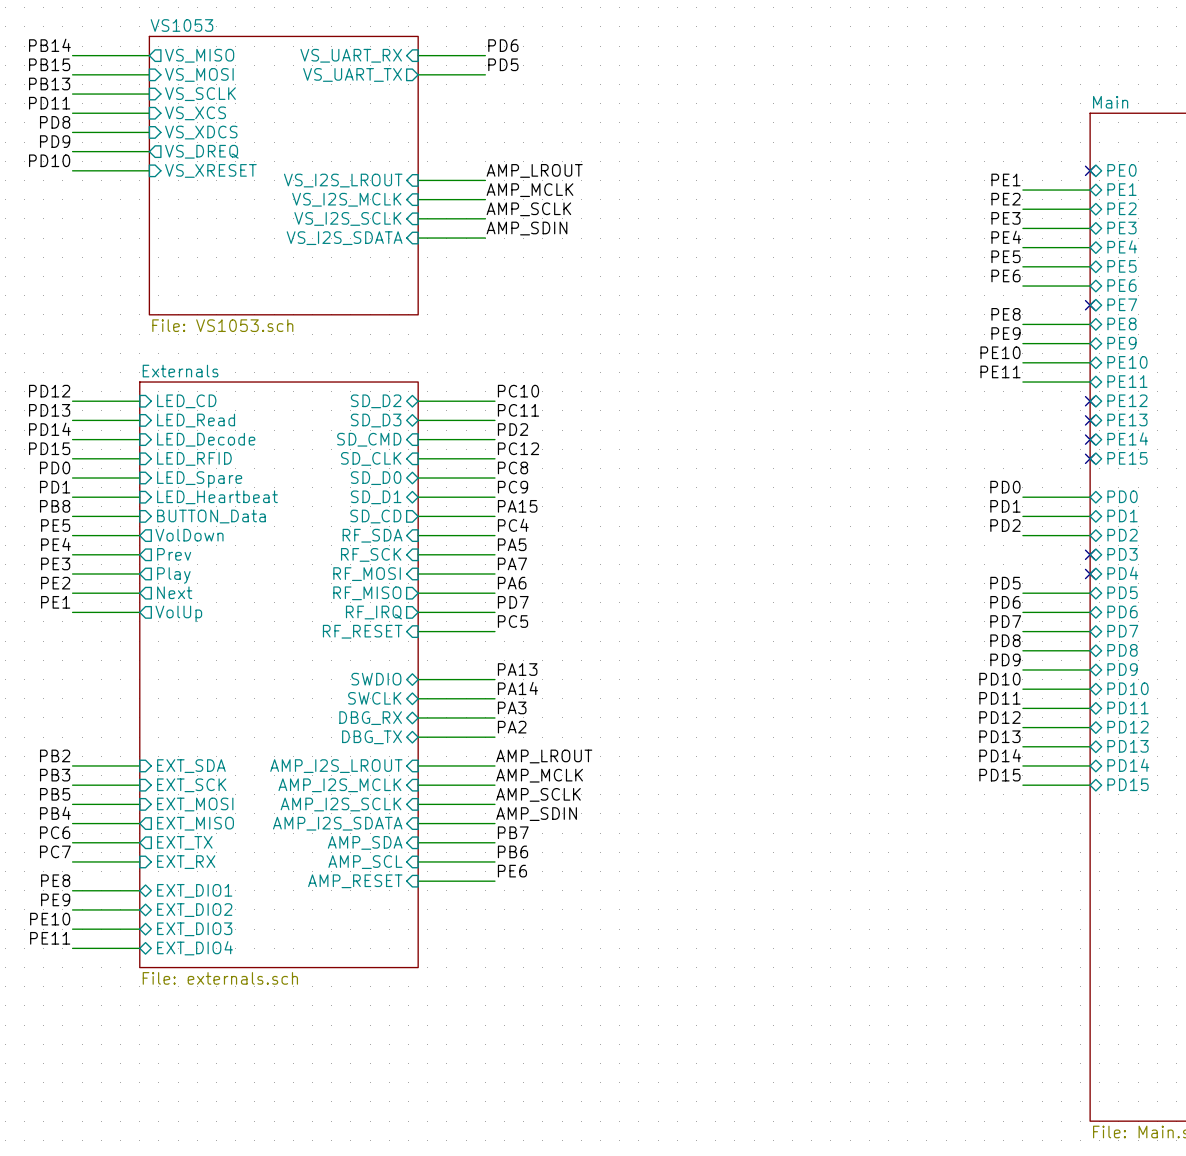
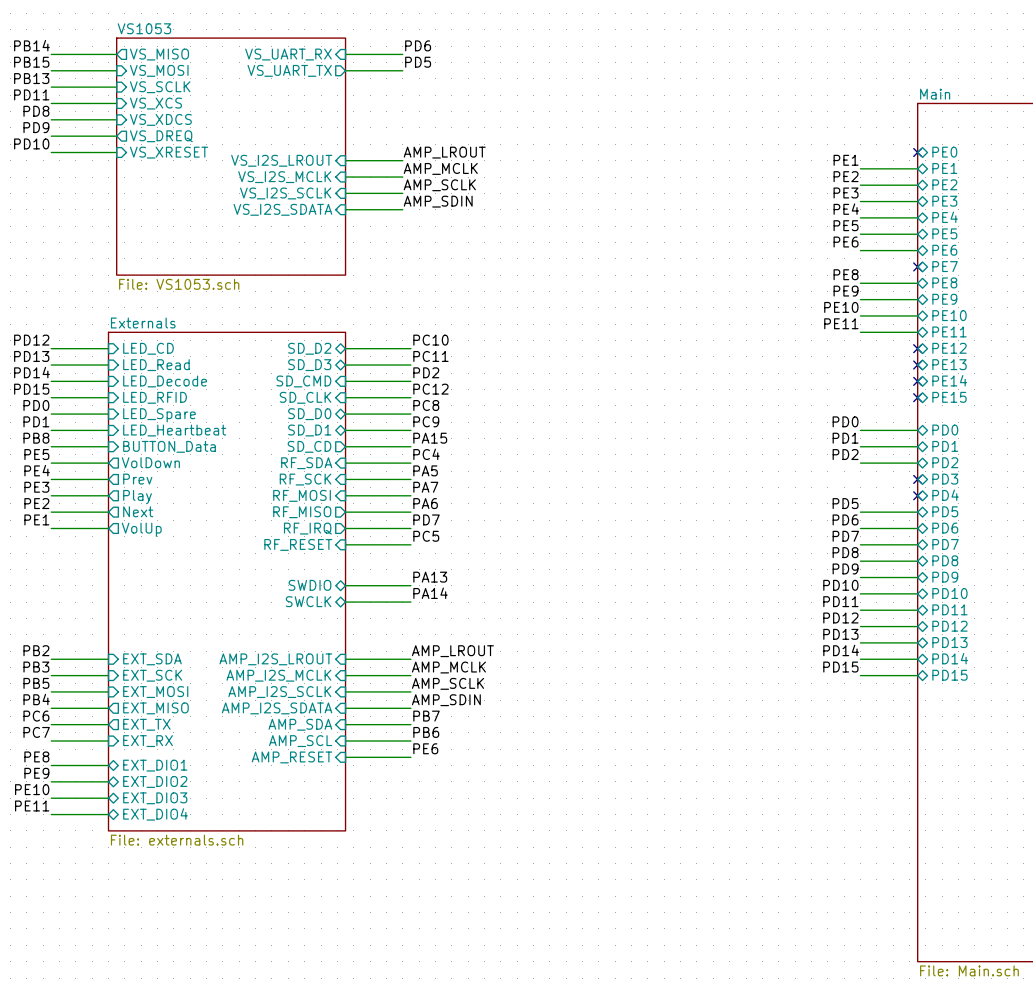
label: PA3 (512, 707) -> none
wire: (418, 717) (494, 717) -> none
sheet pin: DBG_RX (370, 718) -> none
label: PA2 (512, 727) -> none
sheet pin: DBG_TX (372, 737) -> none
wire: (418, 737) (494, 737) -> none

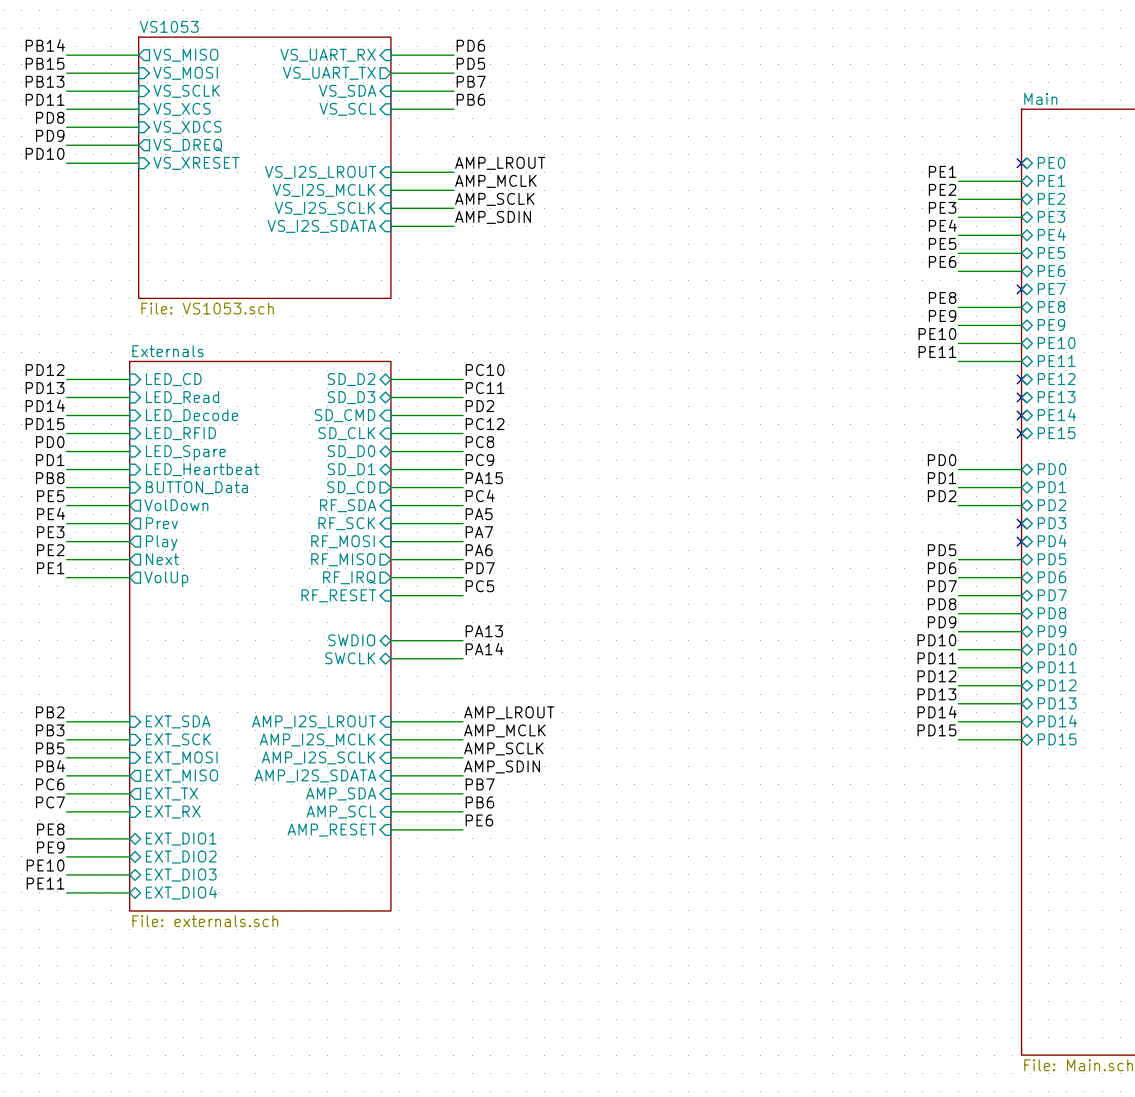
label: none -> PB7 (471, 81)
sheet pin: none -> VS_SDA (347, 91)
wire: none -> (390, 91) (453, 91)
label: none -> PB6 (470, 99)
sheet pin: none -> VS_SCL (347, 109)
wire: none -> (390, 109) (453, 109)

